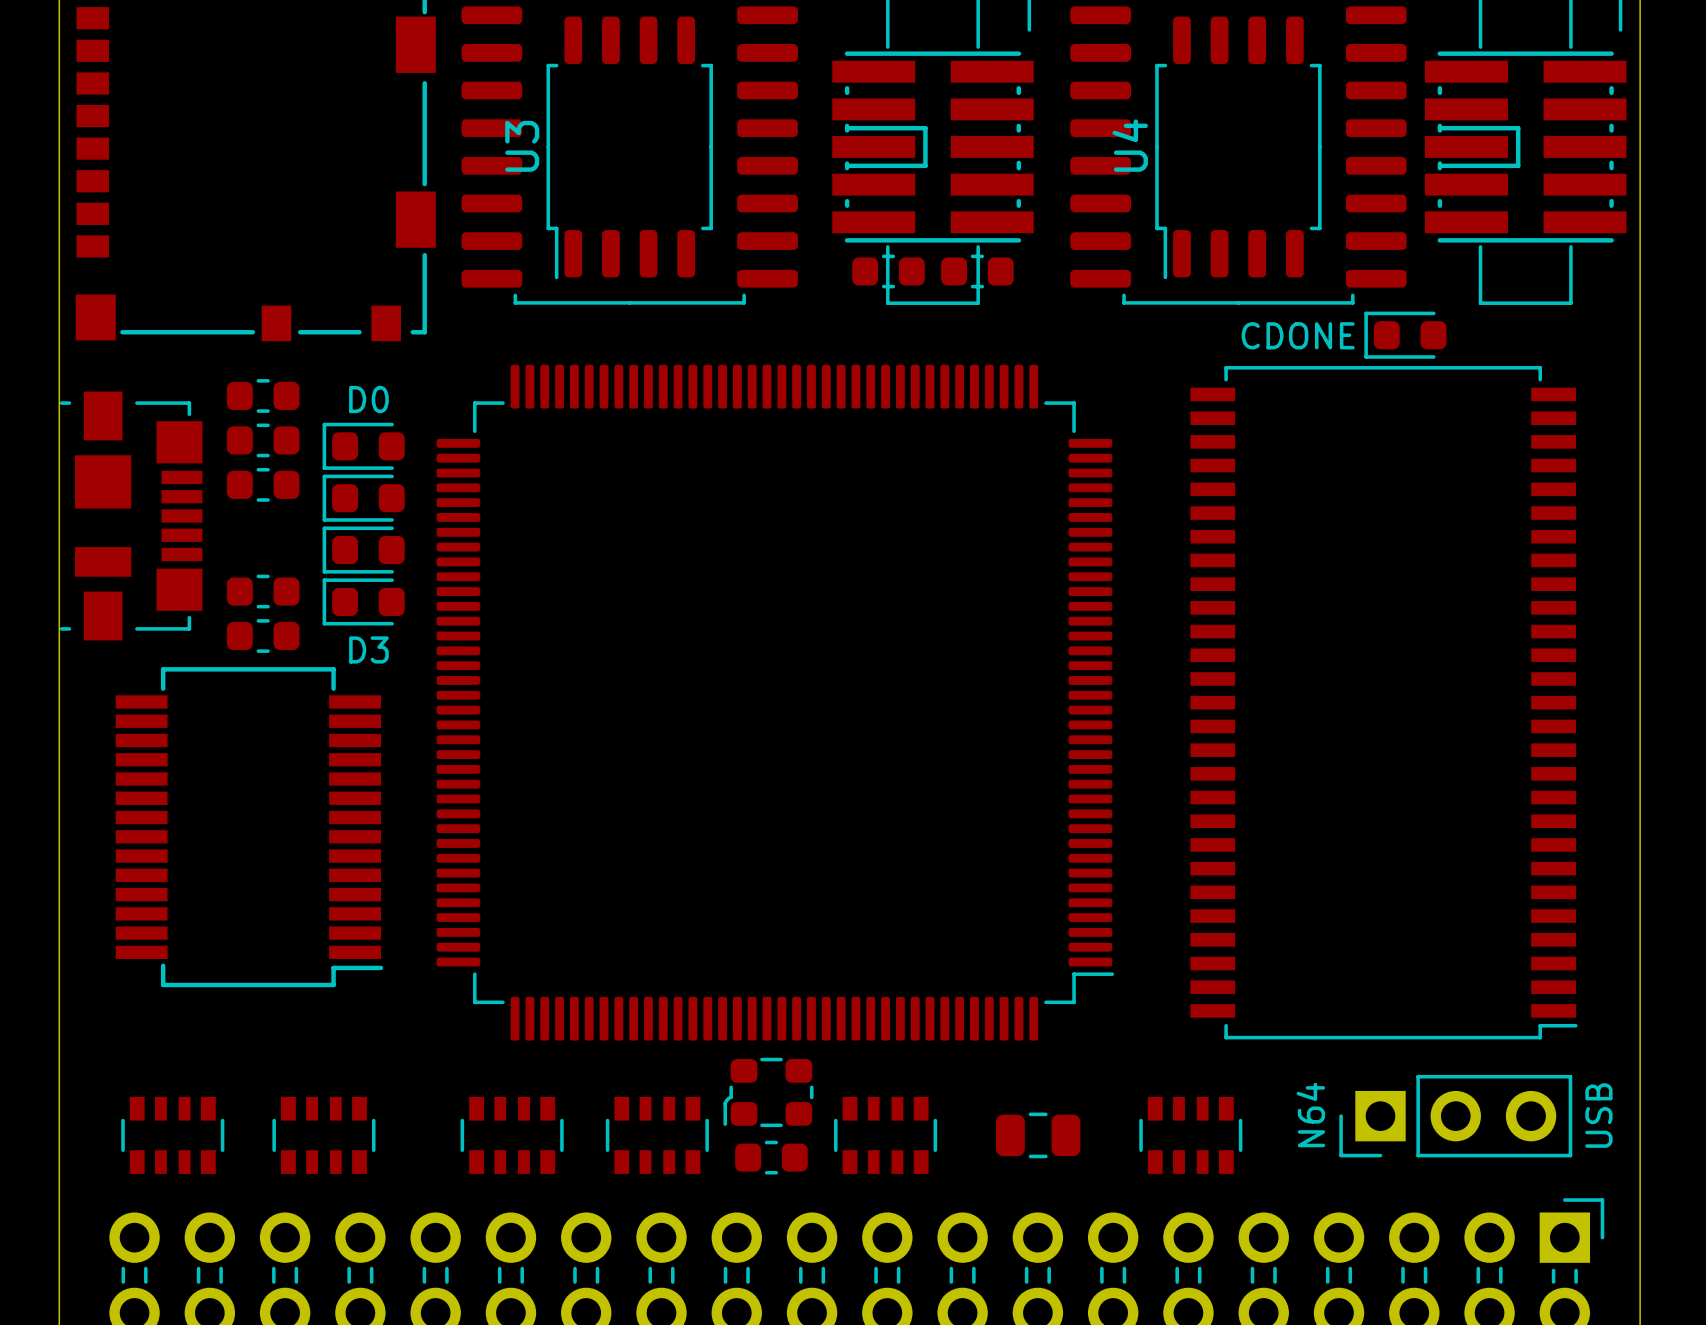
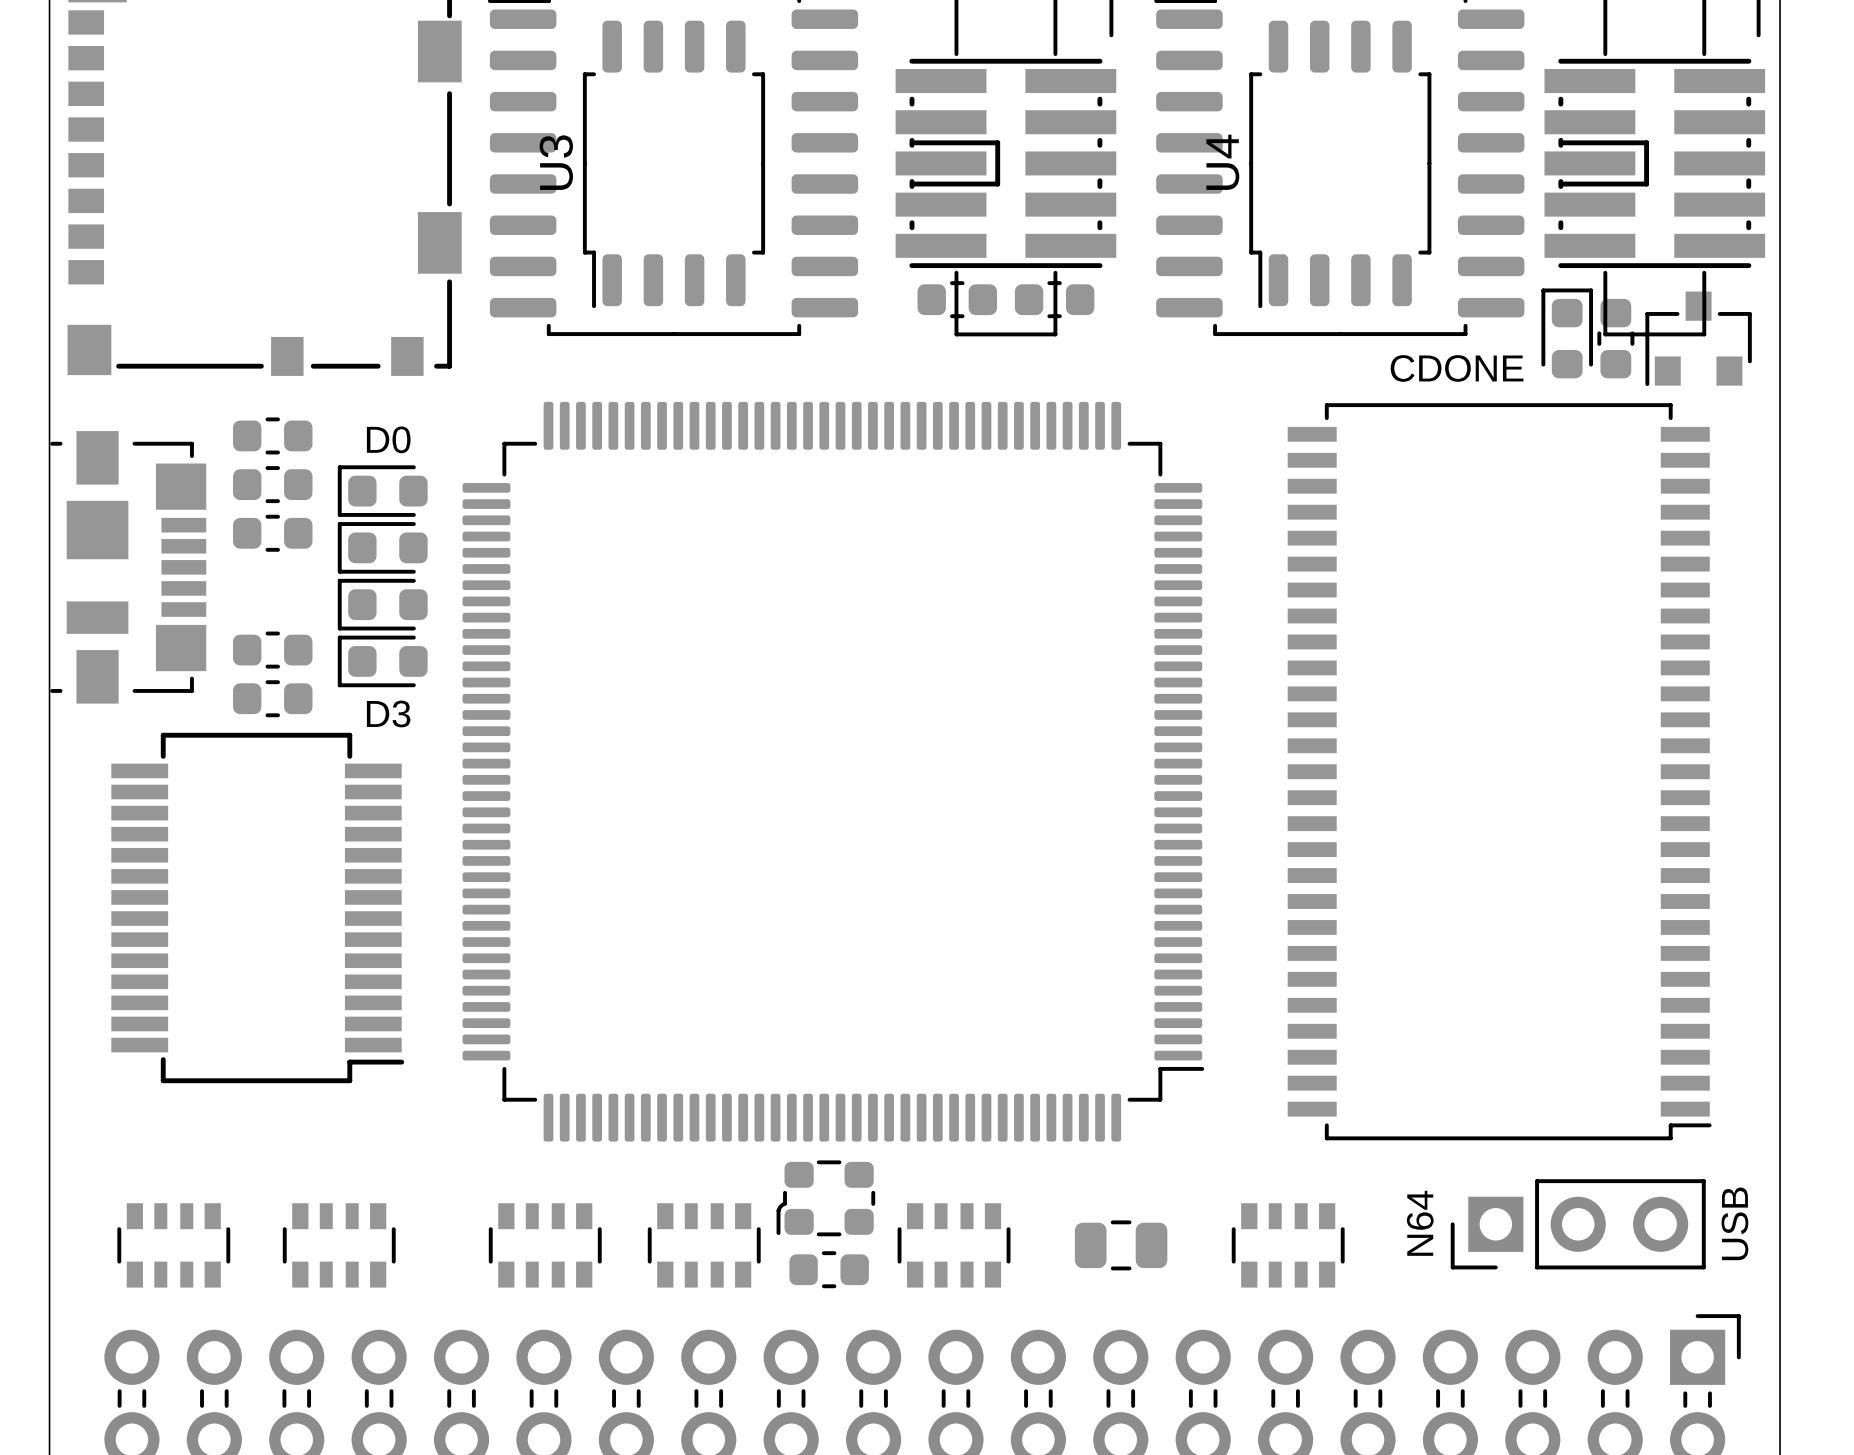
part: none -> (1615, 338)
part: none -> (1698, 338)
text position: CDONE (1298, 335) -> CDONE (1457, 368)
part rotation: 0° (1405, 335) -> 90° clockwise (1567, 333)
part position: (1405, 335) -> (1567, 333)

